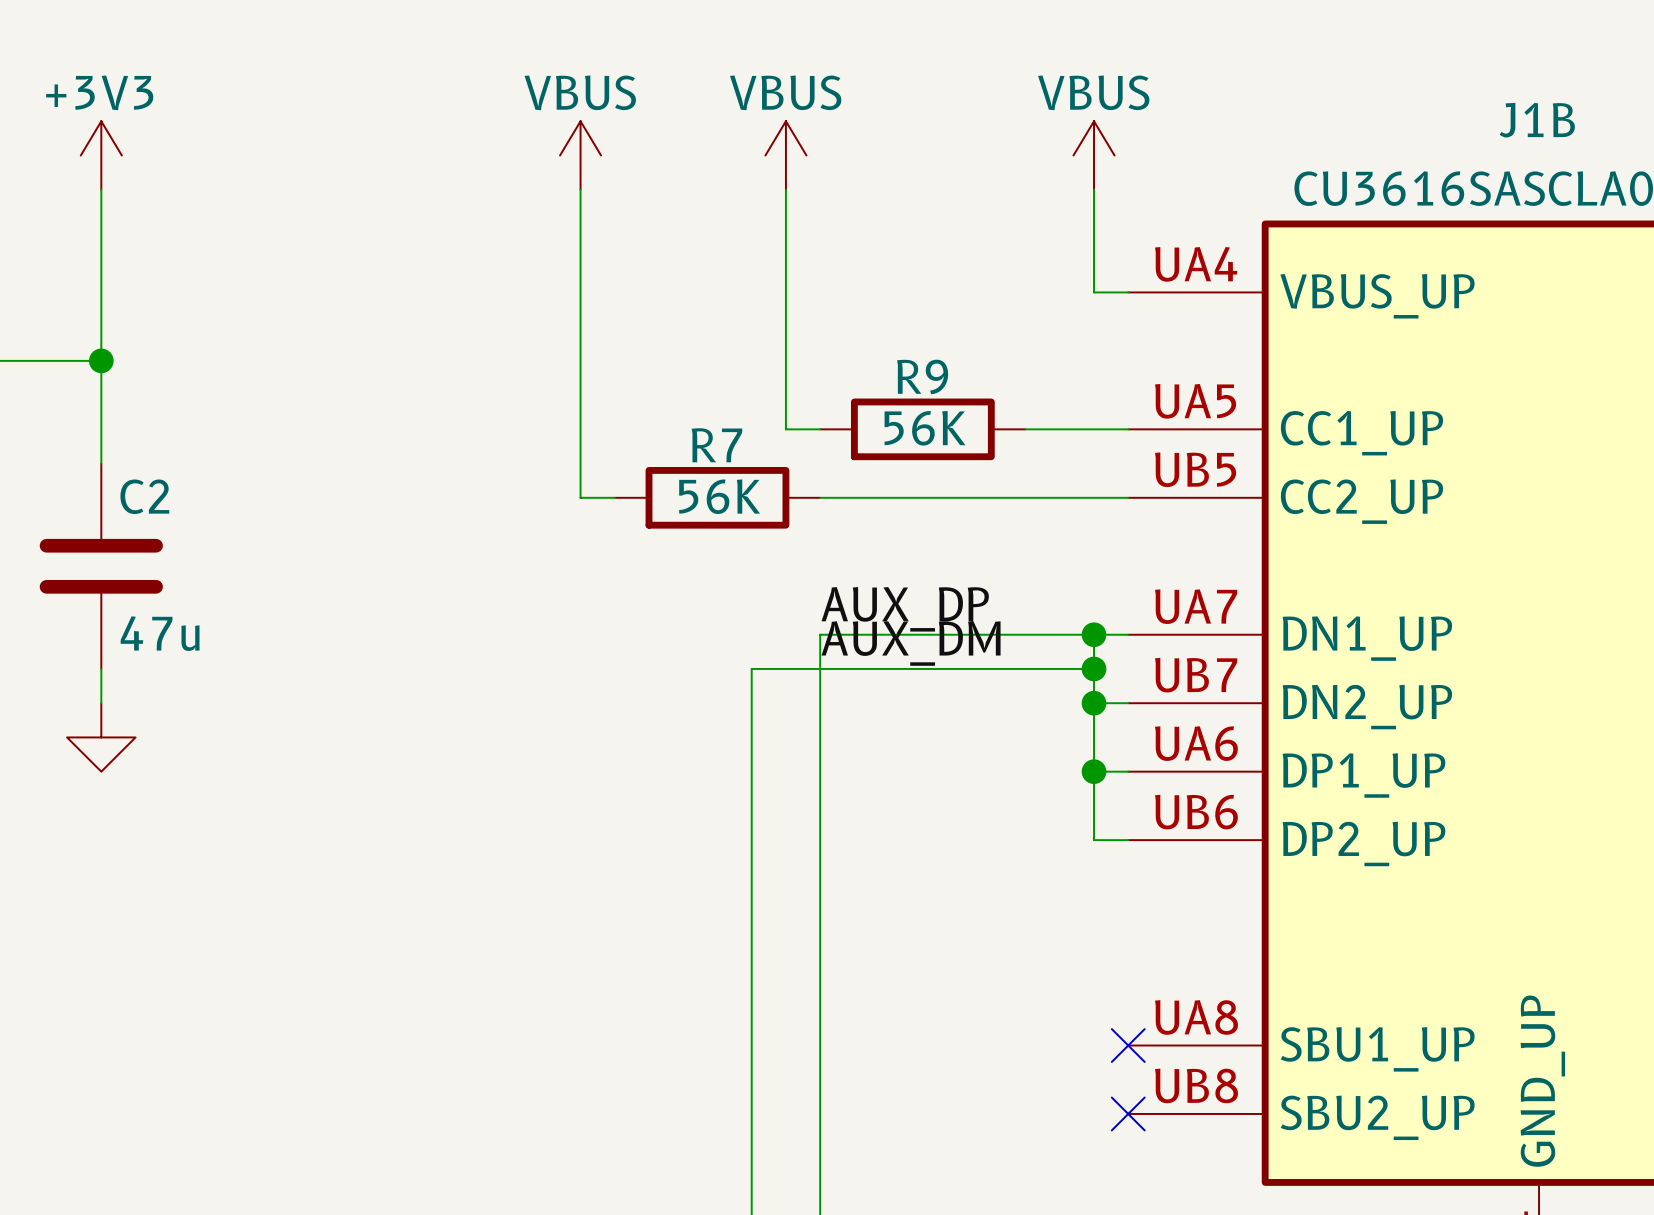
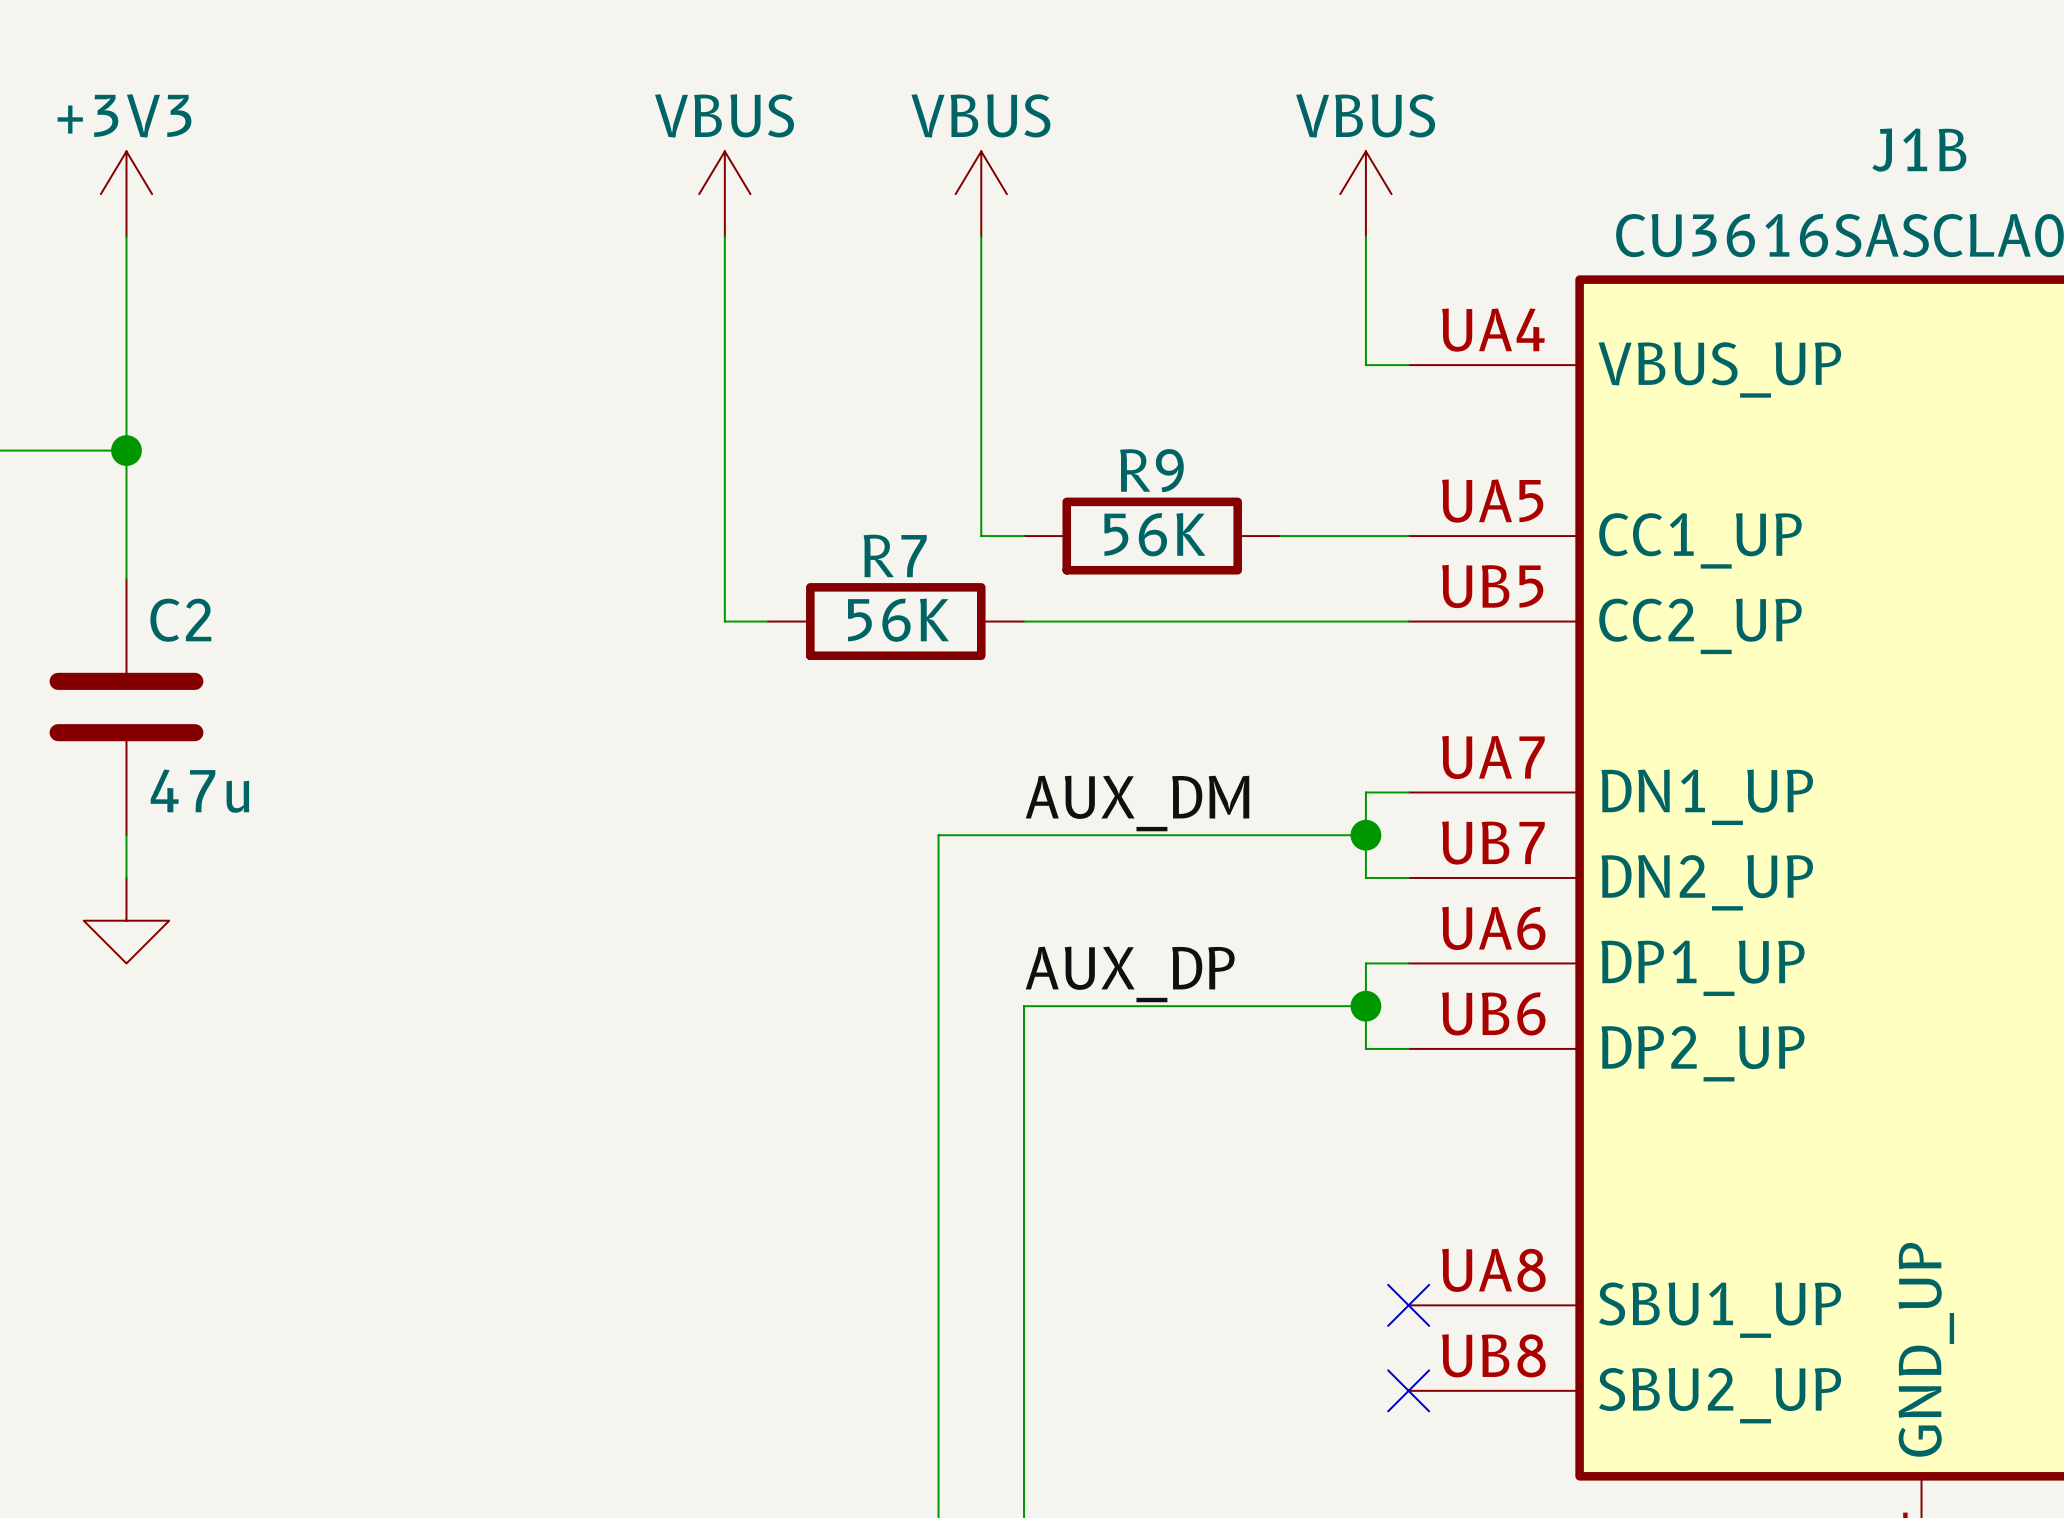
label position: AUX_DP (905, 609) -> AUX_DP (1130, 974)
wire: (1094, 634) (820, 634) (820, 805) -> (1365, 1006) (1024, 1006)
junction: (1094, 634) -> none
wire: (1094, 703) (1094, 771) -> none
junction: (1094, 703) -> none
junction position: (1094, 771) -> (1365, 1006)

